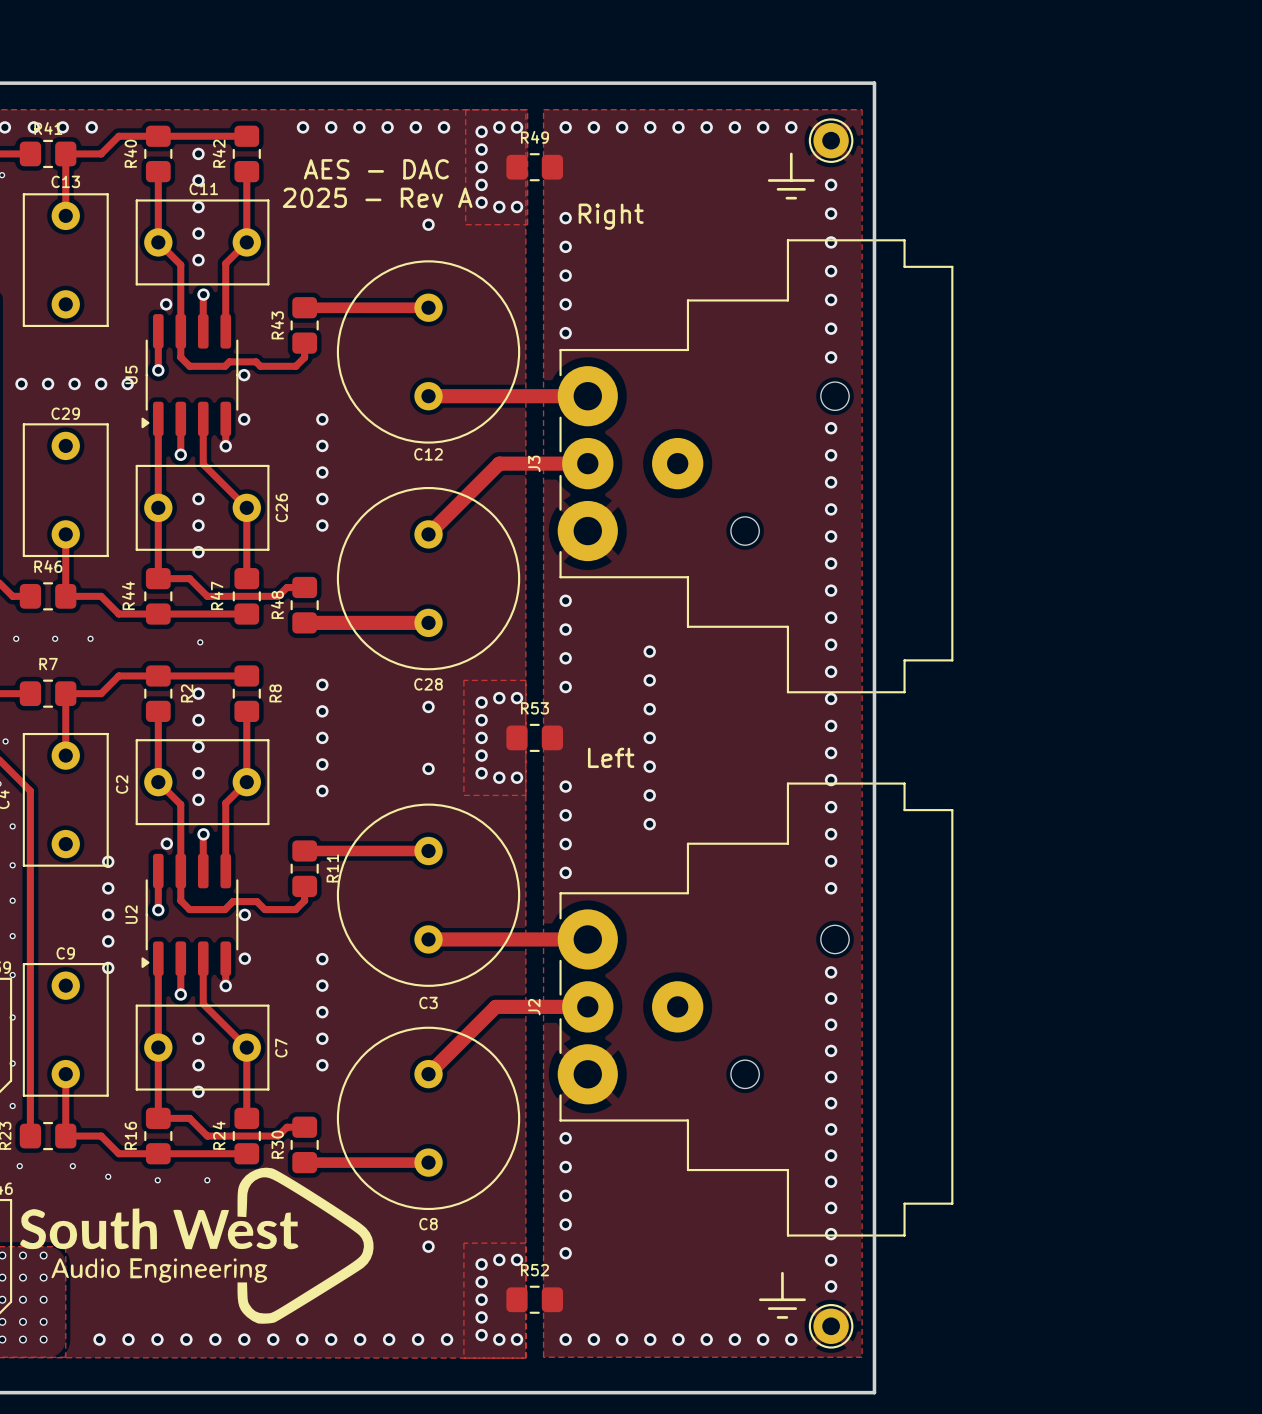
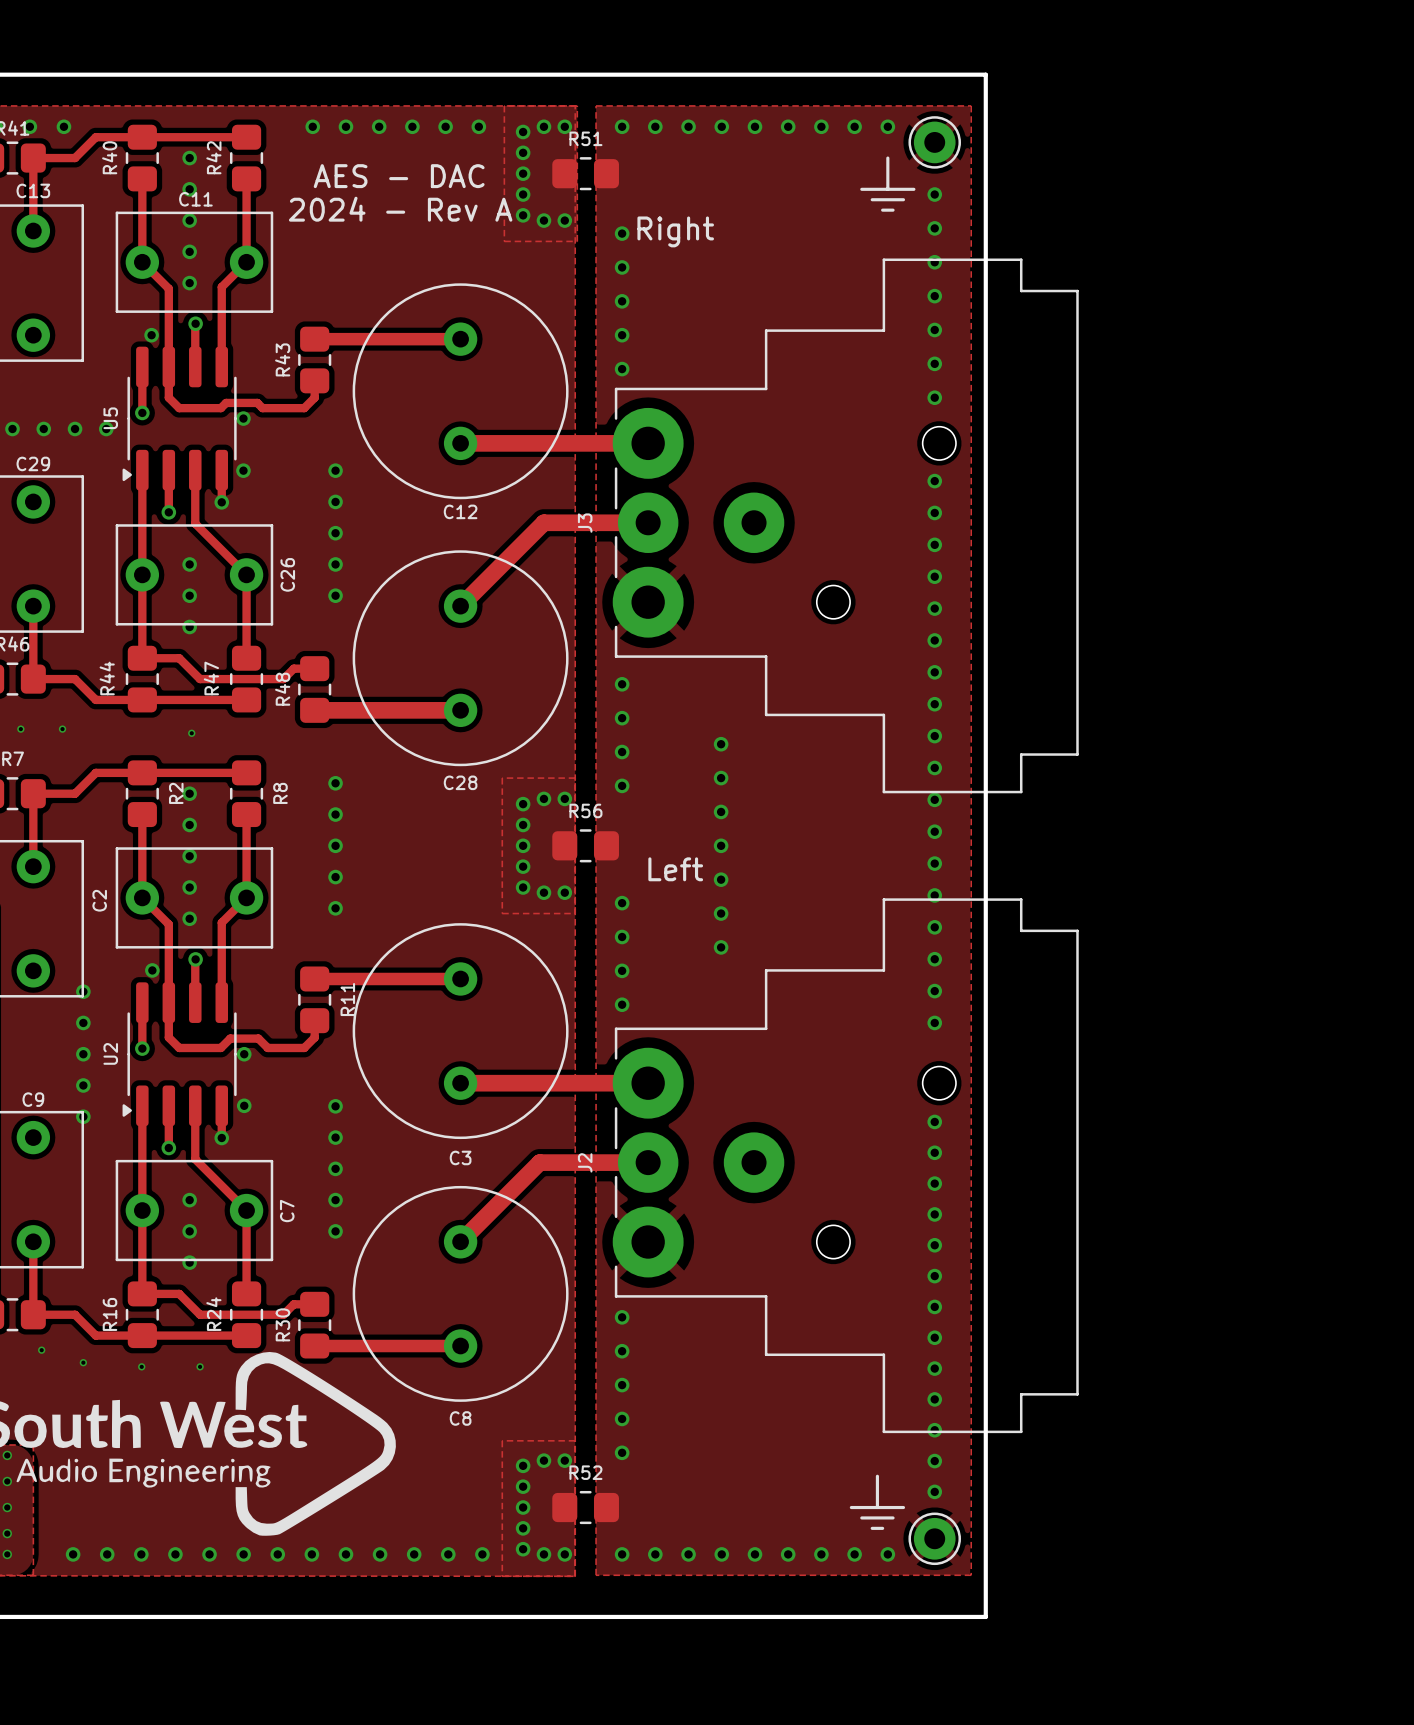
R49 name: R49 (534, 137) -> R51 (585, 138)
text: 2025 - Rev A (377, 197) -> 2024 - Rev A (400, 209)
via: (428, 224) -> none
via: (428, 706) -> none
R53 name: R53 (534, 708) -> R56 (585, 810)
via: (428, 768) -> none
via: (428, 1246) -> none

